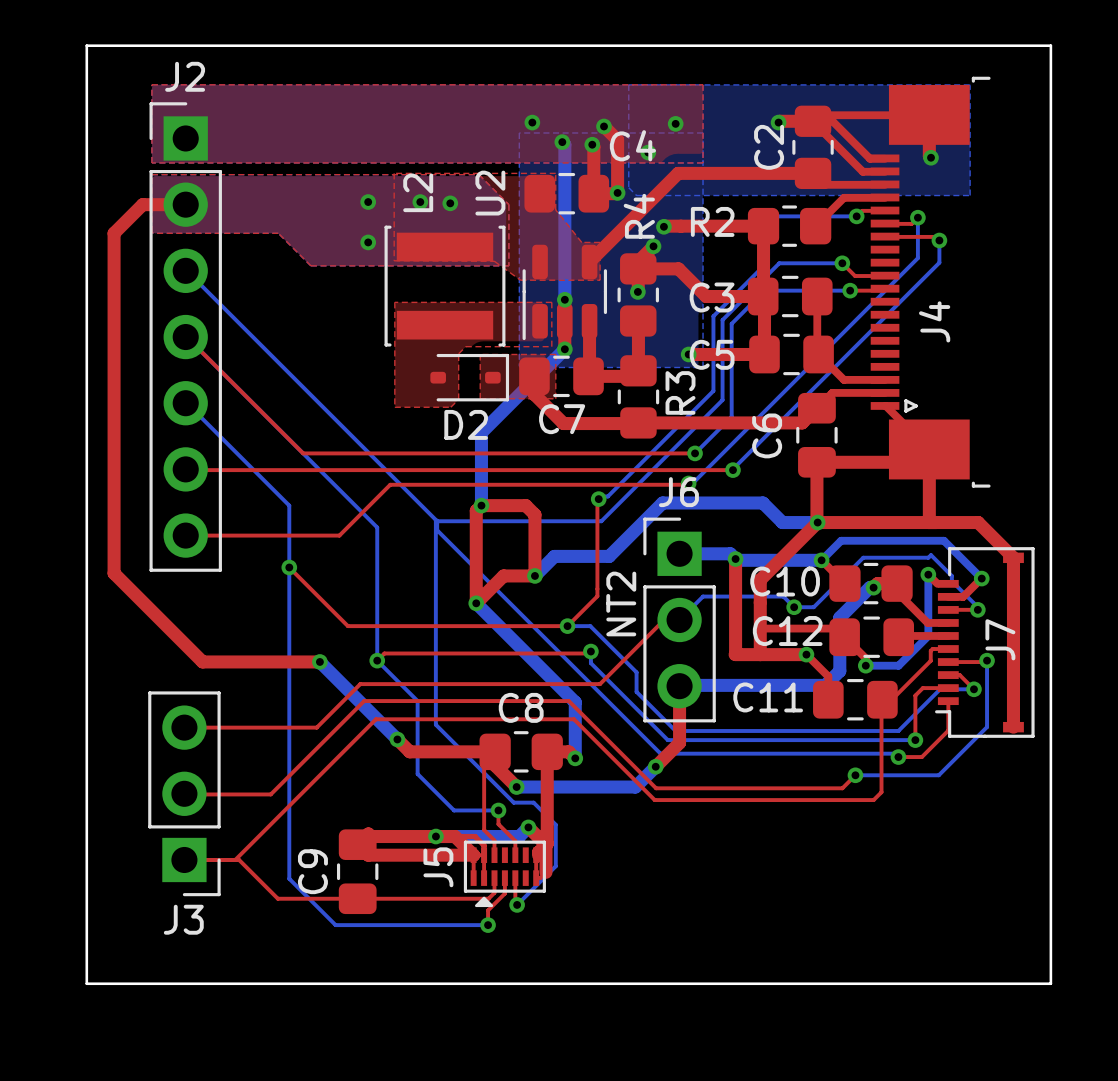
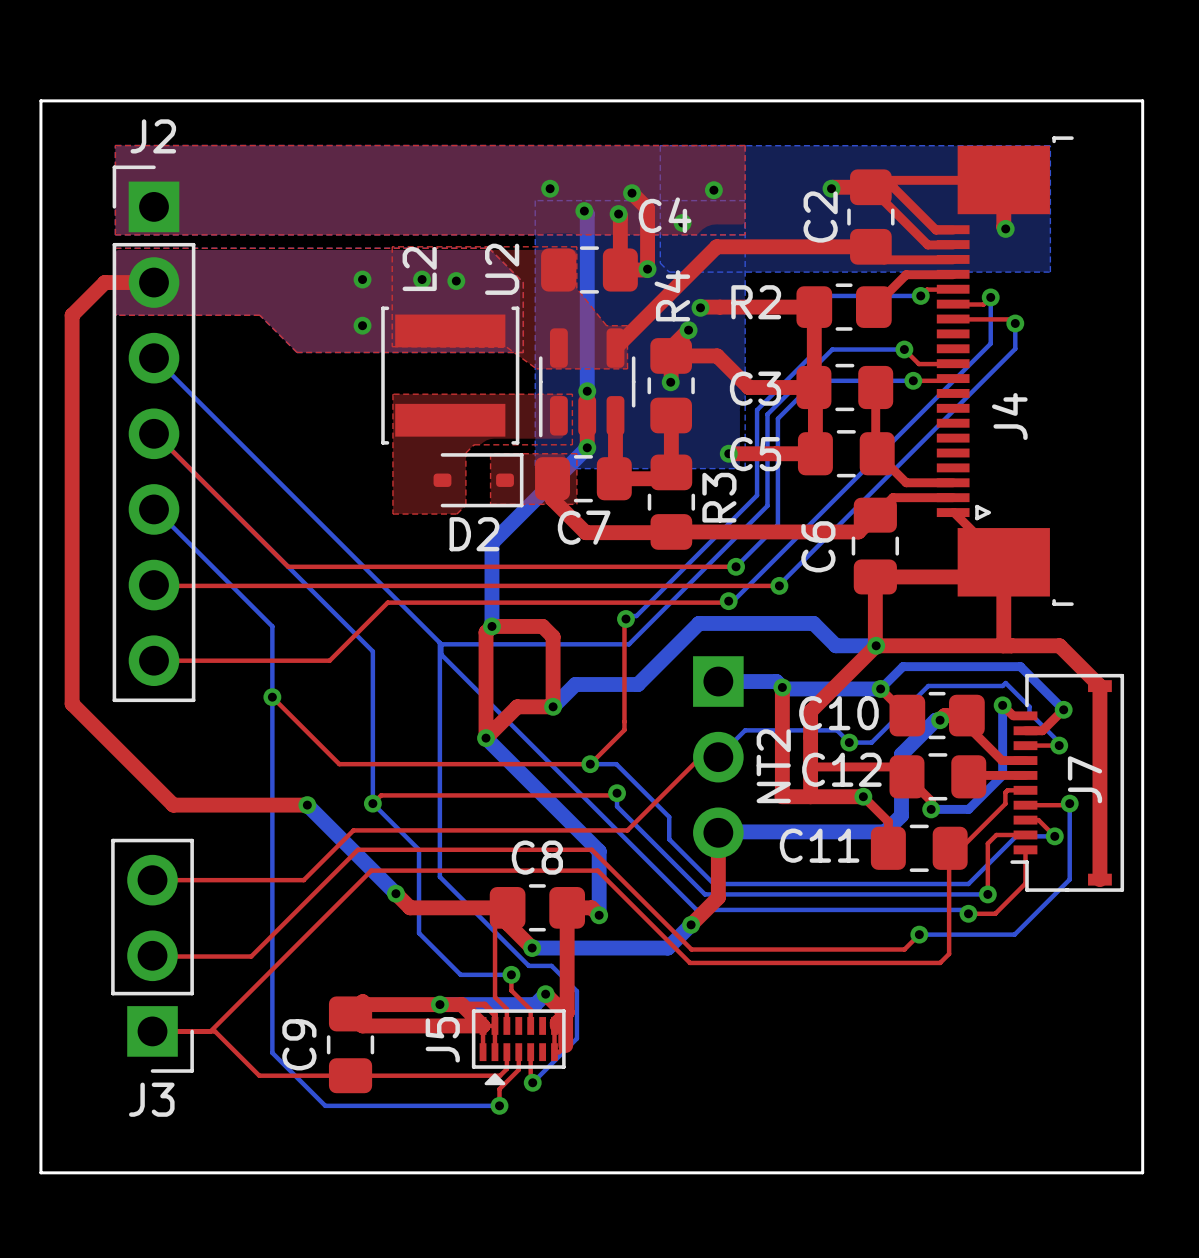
NT2 name position: NT2 (621, 603) -> NT2 (773, 766)
J6 side: top (679, 619) -> bottom (718, 757)

